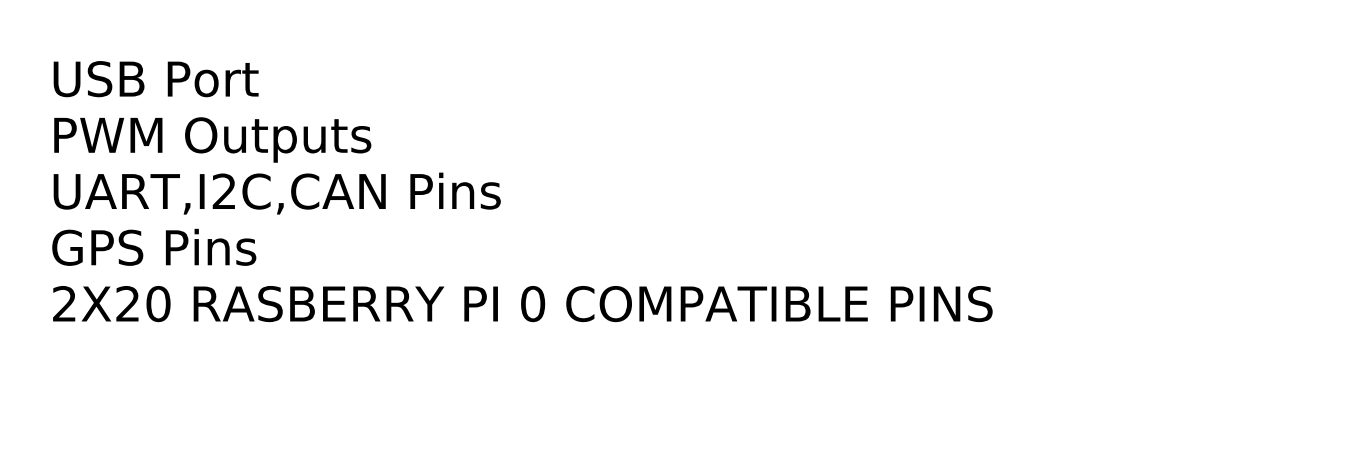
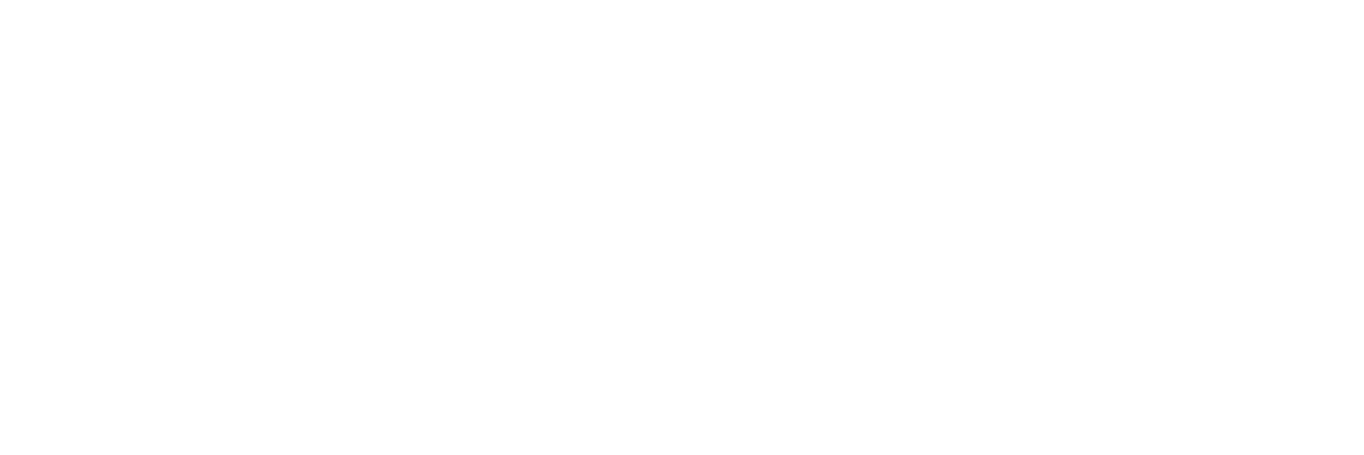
text: USB Port (156, 79) -> none
text: PWM Outputs (212, 140) -> none
text: UART,I2C,CAN Pins (277, 193) -> none
text: GPS Pins (154, 247) -> none
text: 2X20 RASBERRY PI 0 COMPATIBLE PINS (522, 304) -> none

